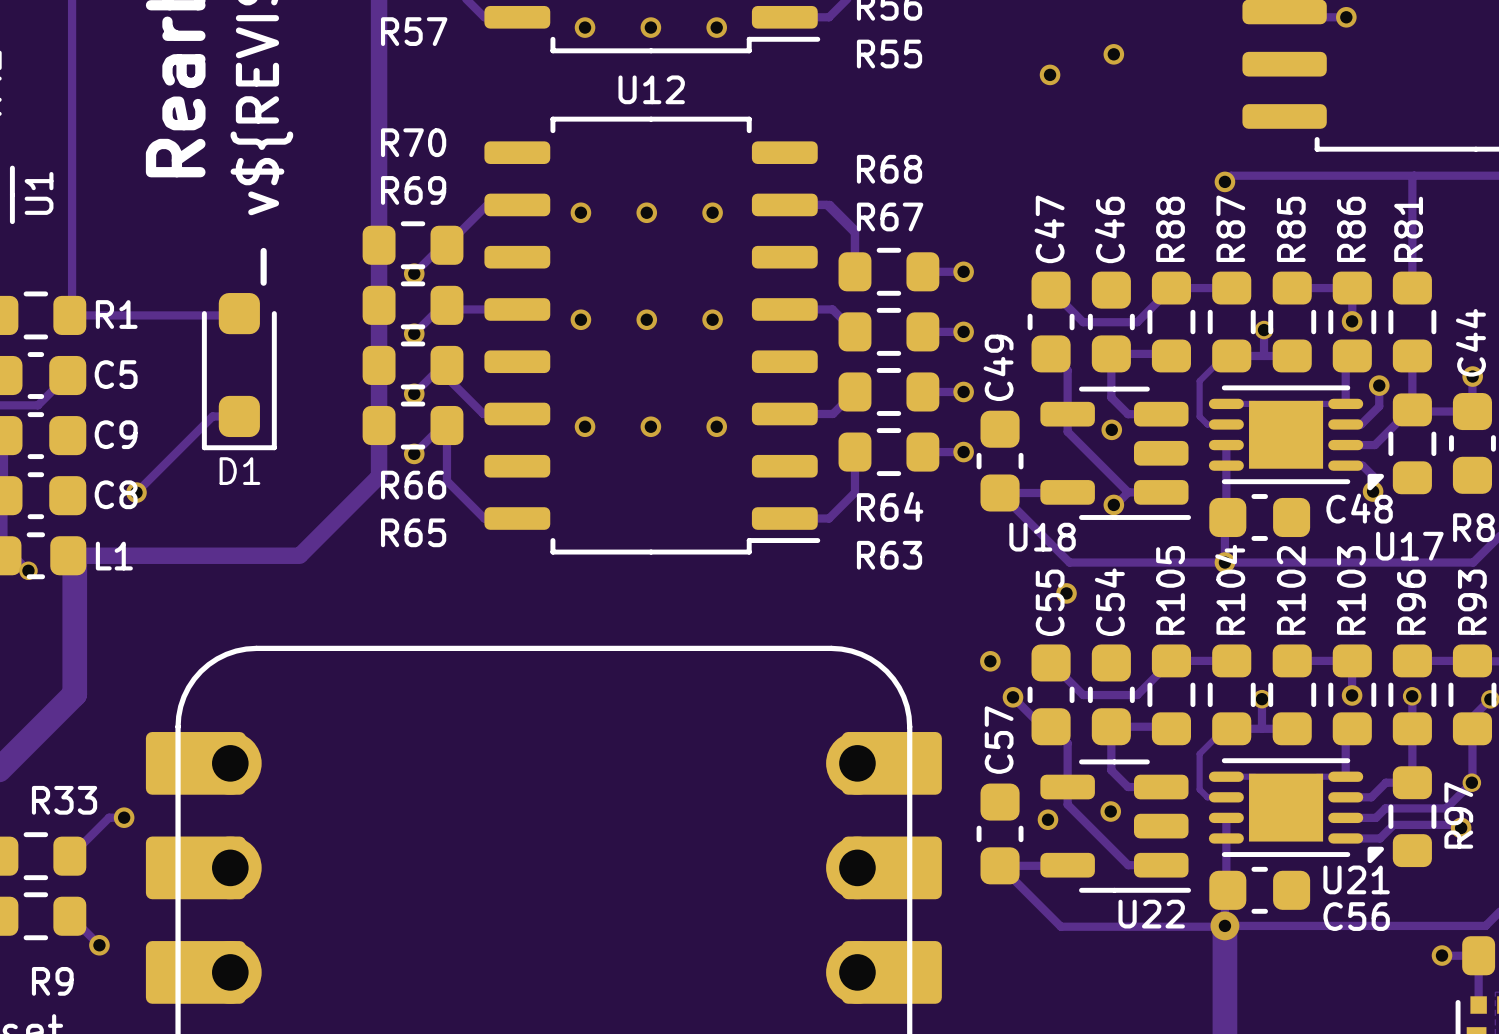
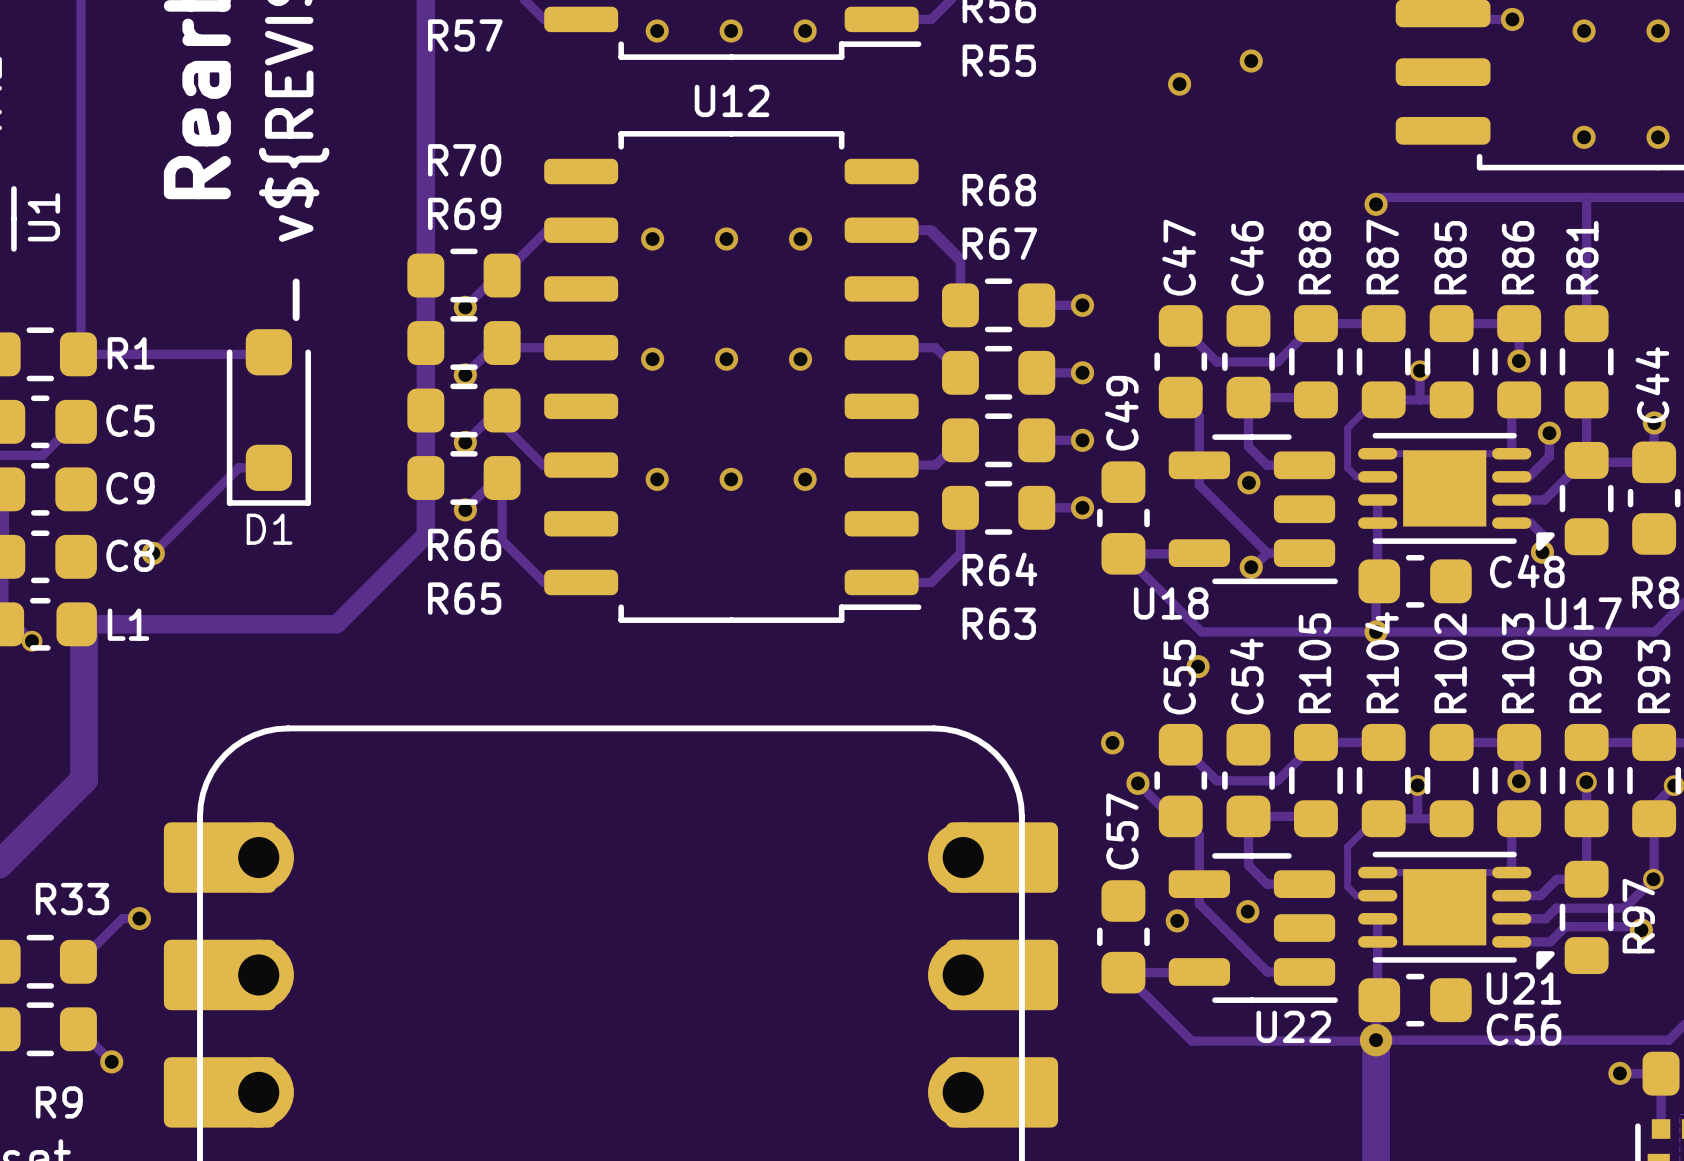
via: none -> (1584, 30)
via: none -> (1658, 30)
via: none -> (1584, 137)
via: none -> (1658, 137)

